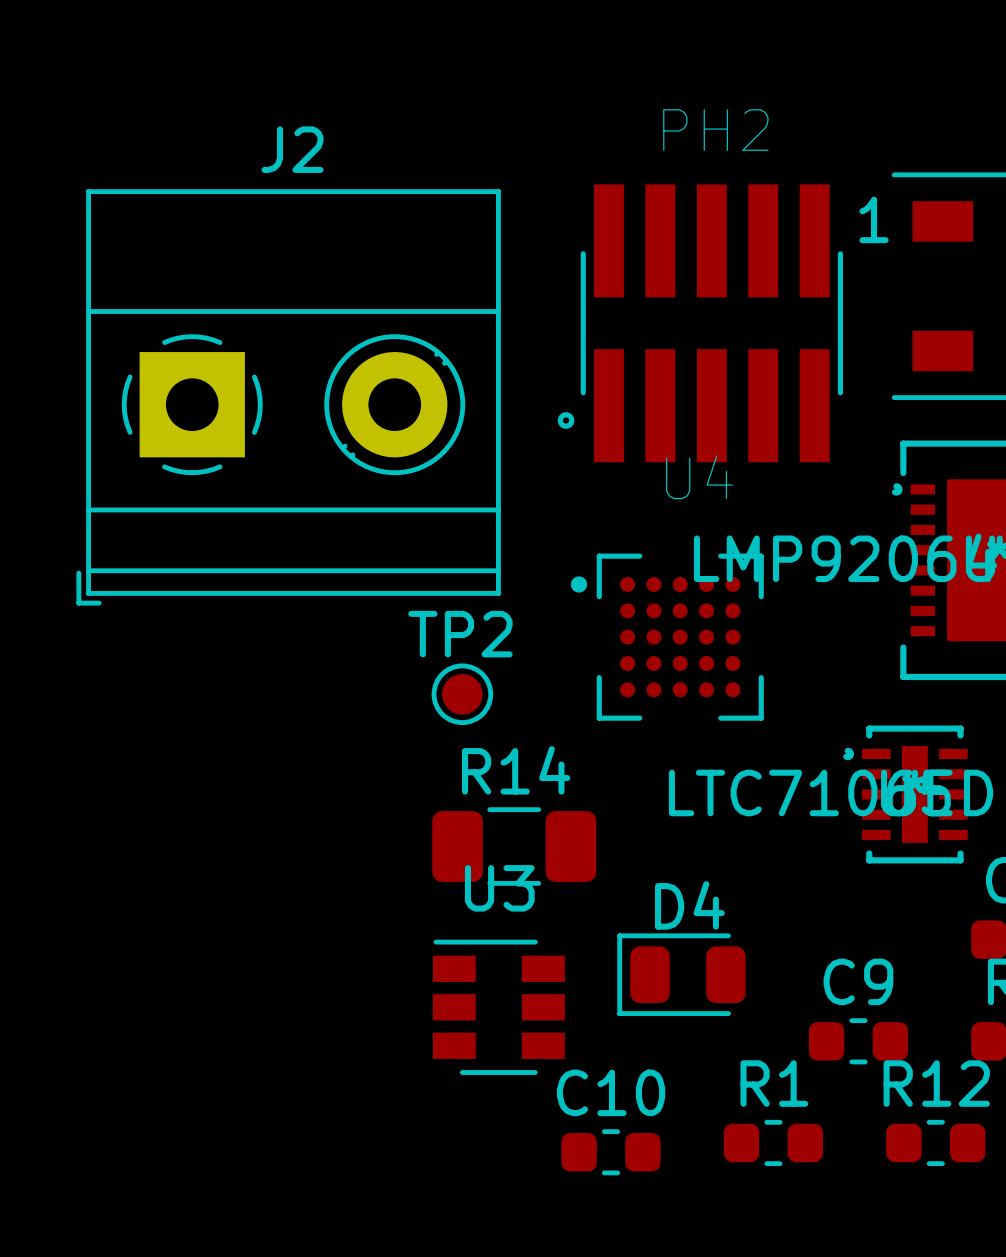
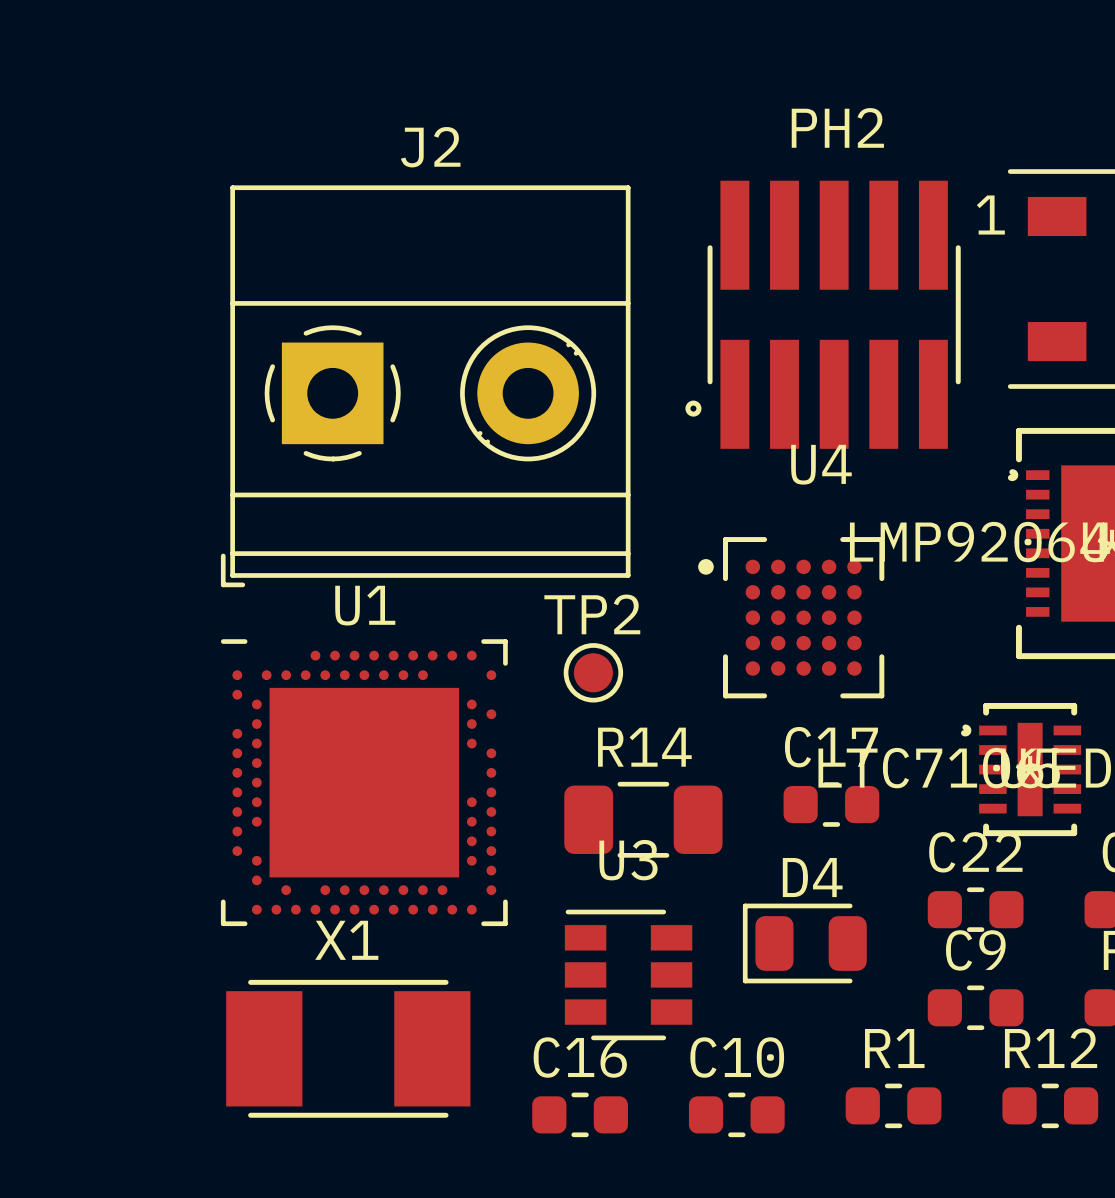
U1: none -> (364, 782)
C17: none -> (831, 804)
C22: none -> (975, 909)
X1: none -> (348, 1048)
C16: none -> (580, 1114)

